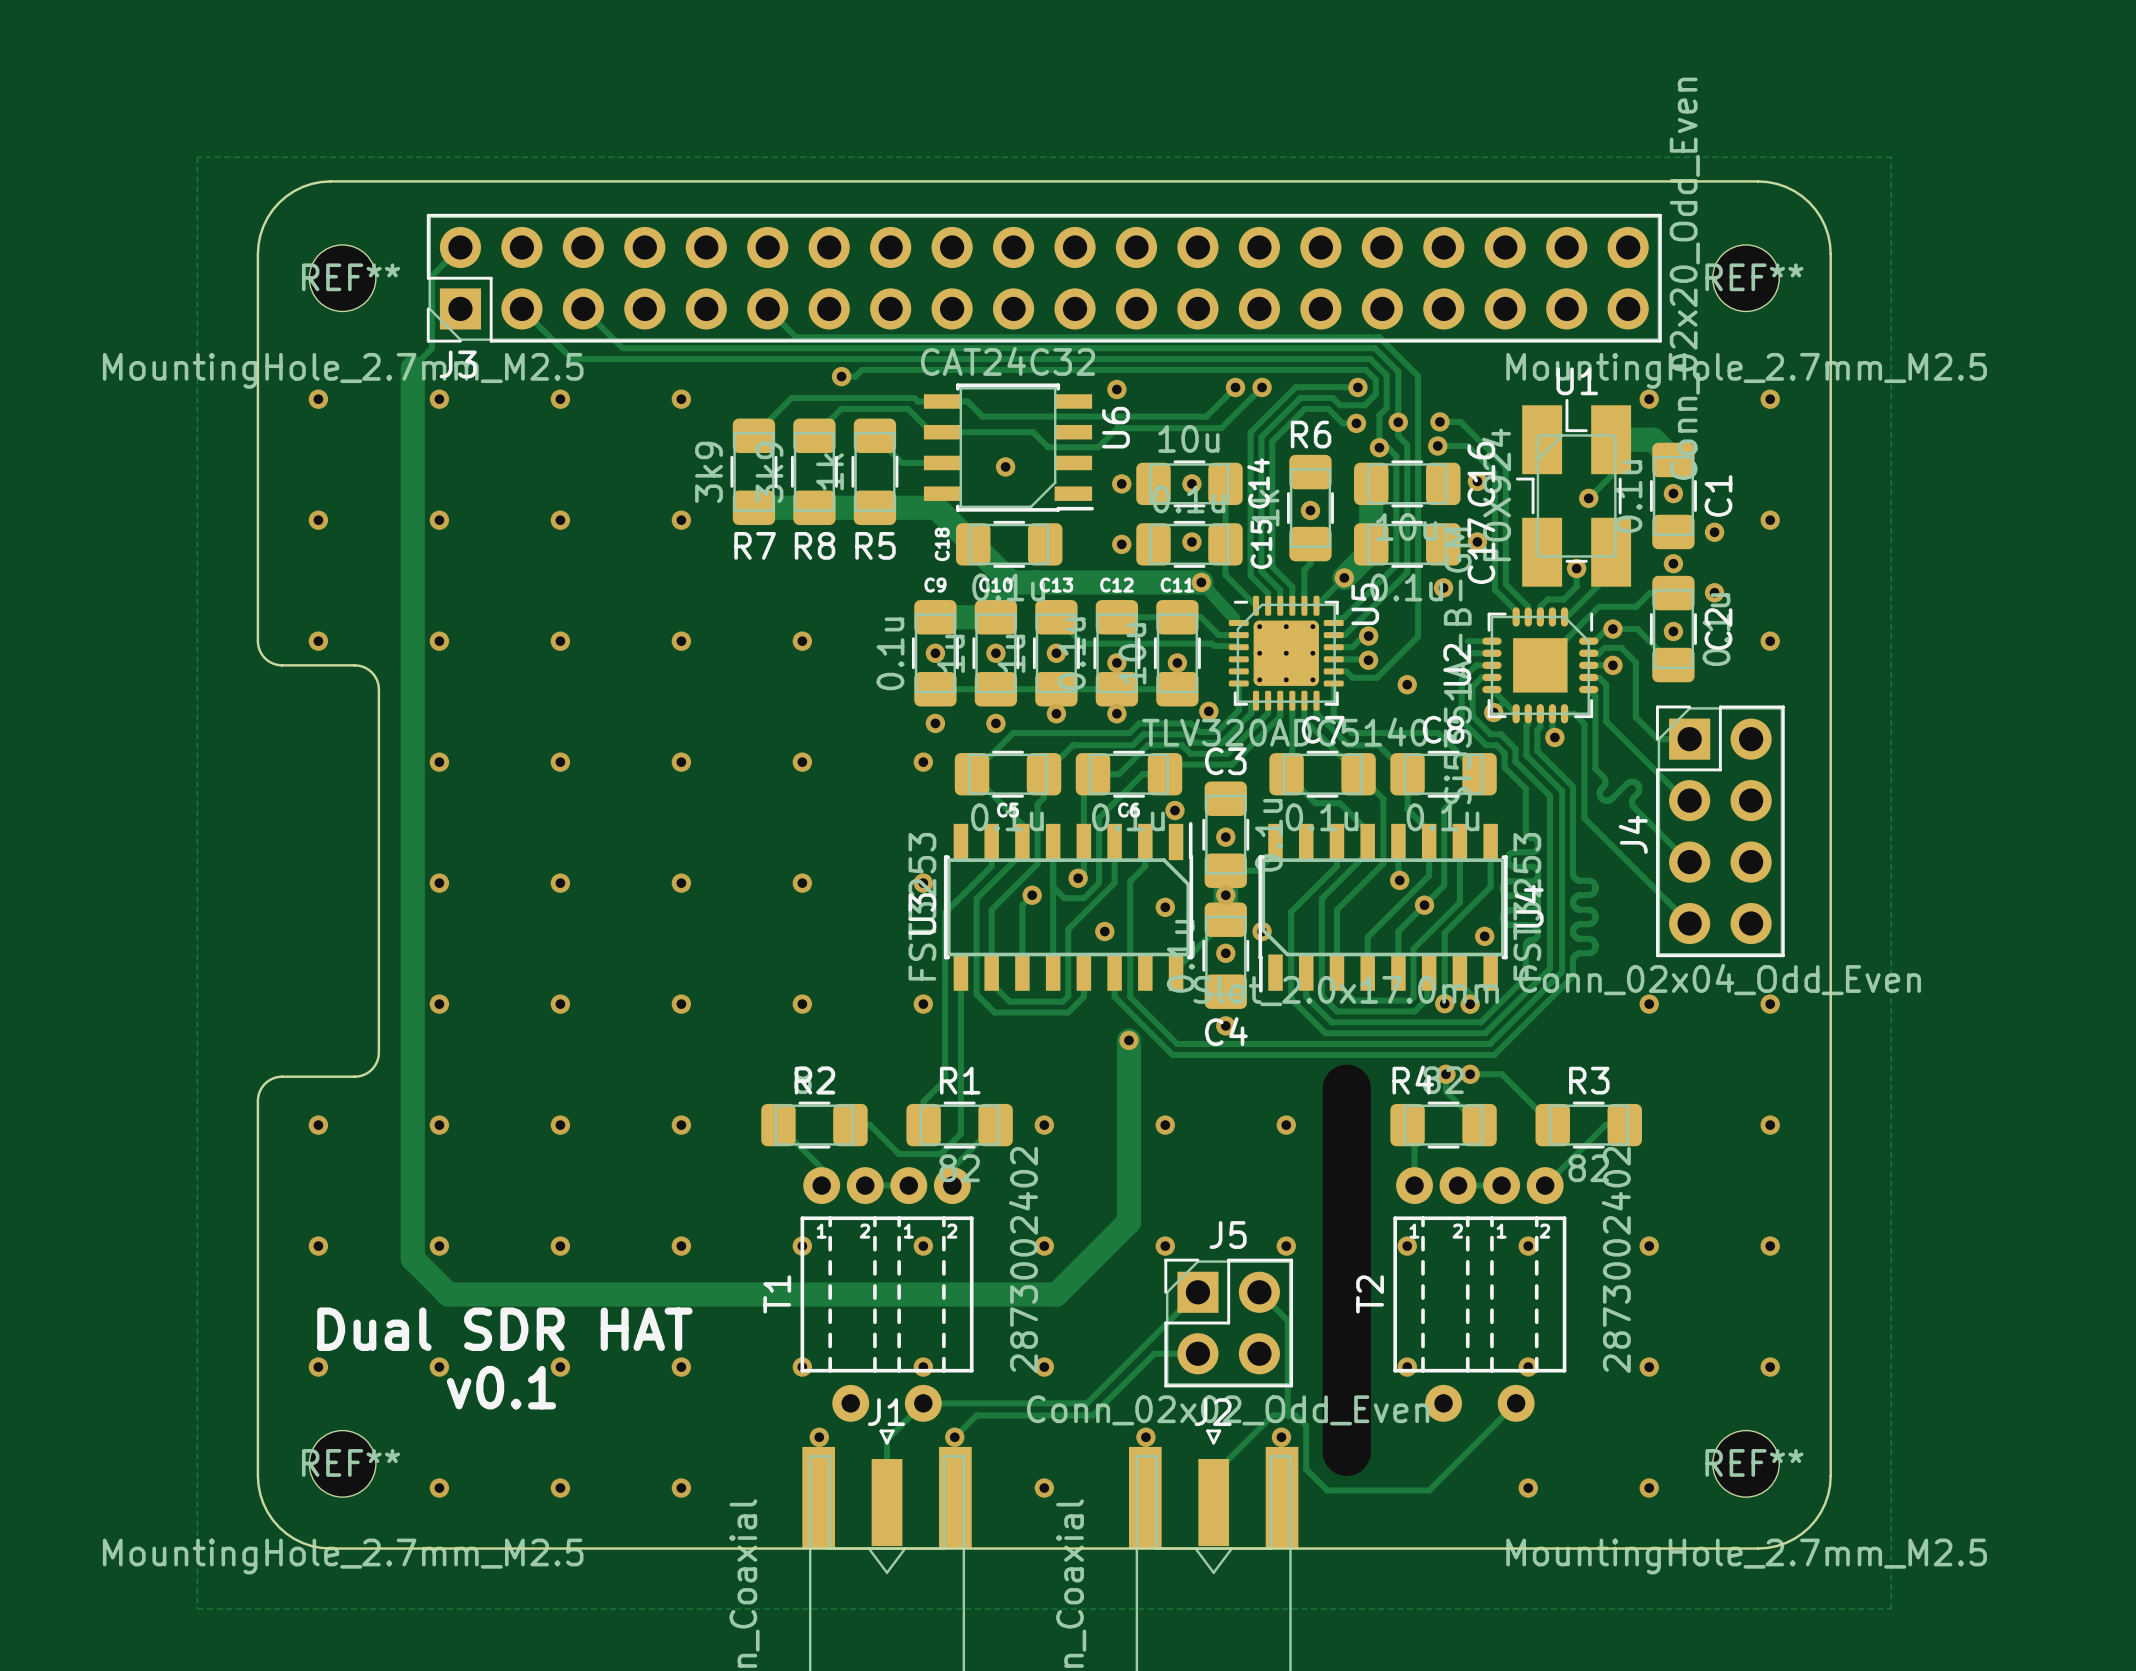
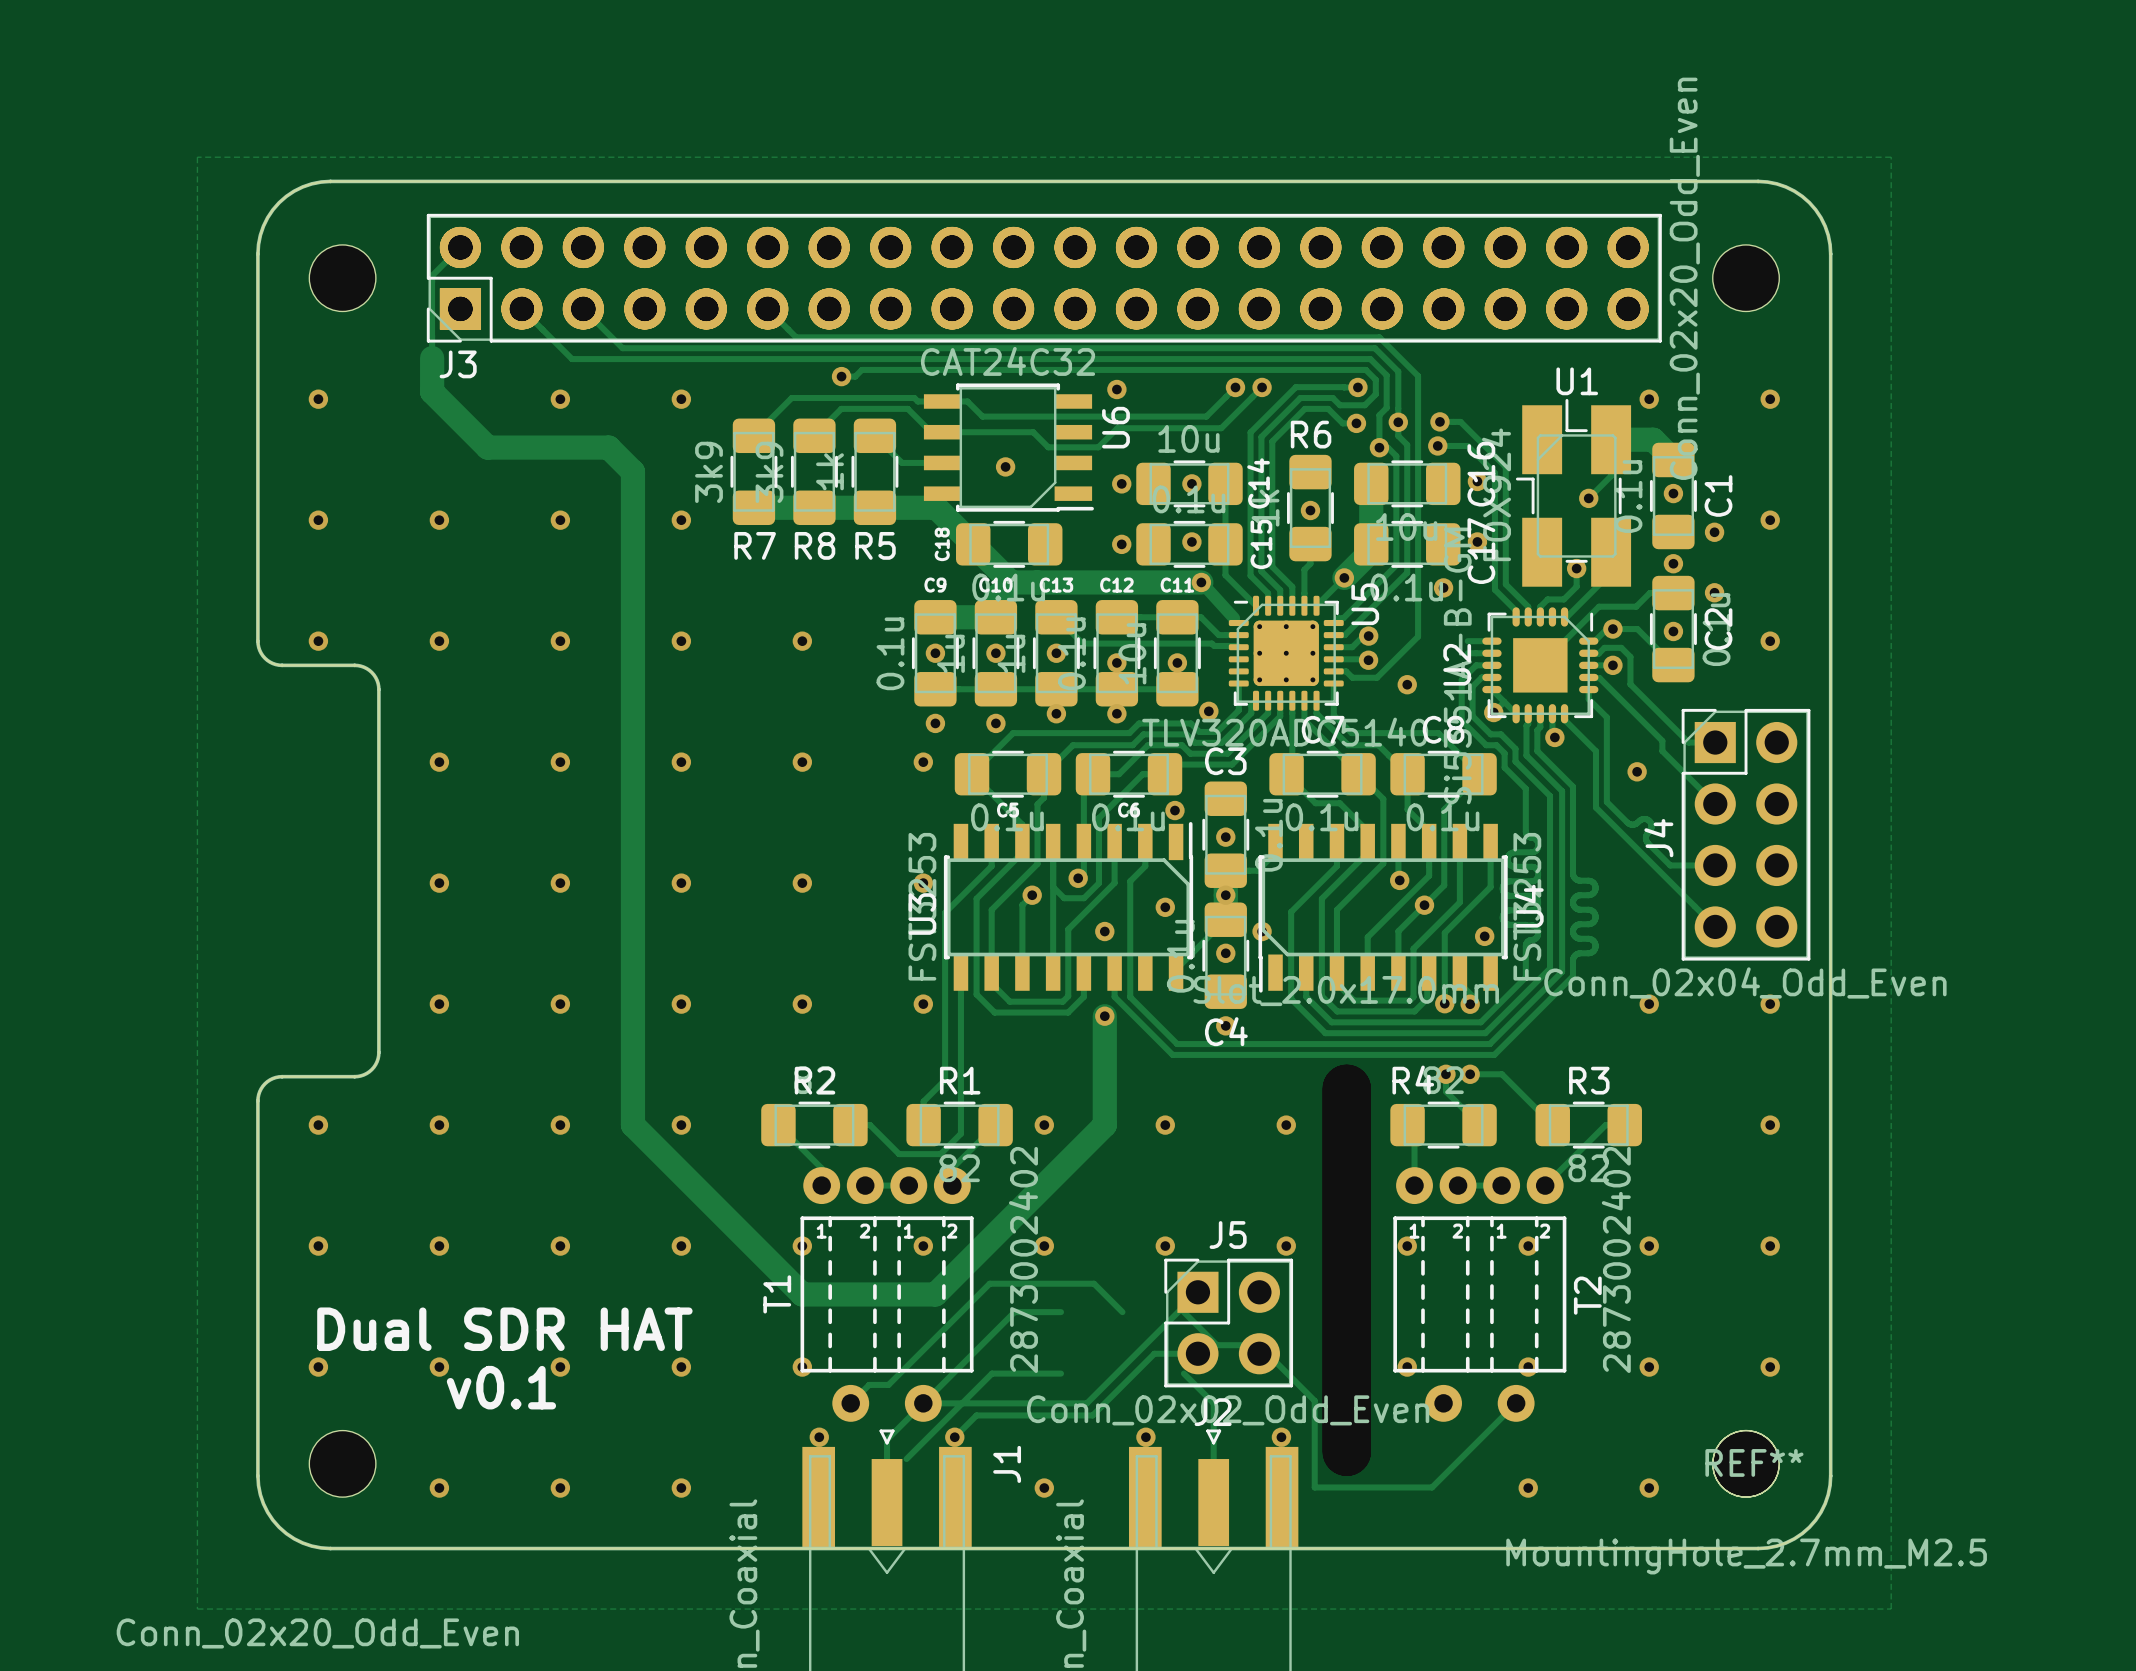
REF**: MountingHole_2.7mm_M2.5 (342, 278) -> none
REF**: MountingHole_2.7mm_M2.5 (1746, 278) -> none
track: (432, 348) (412, 367) (412, 1258) (448, 1294) (802, 1294) -> (432, 348) (432, 391) (487, 447) (608, 447) (632, 471) (632, 1125) (802, 1294)
via: (439, 399) -> none
track: (1630, 656) (1635, 662) (1635, 717) (1657, 739) (1689, 739) -> (1630, 656) (1630, 684) (1688, 742) (1715, 742)
track: (1606, 684) (1606, 721) (1685, 800) (1689, 800) -> (1606, 684) (1662, 740) (1662, 751) (1715, 804)
track: (1588, 689) (1595, 696) (1595, 768) (1605, 780) (1600, 791) (1600, 797) (1604, 800) (1609, 800) (1628, 782) (1635, 782) (1639, 789) (1632, 799) (1633, 806) (1689, 862) -> (1588, 689) (1588, 699) (1606, 717) (1606, 802) (1630, 824) (1634, 824) (1643, 818) (1649, 821) (1651, 827) (1646, 835) (1646, 840) (1670, 865) (1715, 865)
track: (1564, 713) (1574, 713) (1584, 724) (1584, 818) (1689, 923) -> (1564, 713) (1564, 719) (1596, 751) (1596, 807) (1715, 926)
via: none -> (1637, 771)
J4 position: (1720, 831) -> (1746, 834)
part: none -> Conn_02x20_Odd_Even (1044, 864)
track: (1129, 1040) (1129, 1221) (1056, 1294) (935, 1294) -> (1104, 1016) (1104, 1125) (935, 1294)
via position: (1129, 1040) -> (1104, 1016)
track: (1259, 1292) (1287, 1320) (1288, 1415) -> none
T2 name position: T2 (1370, 1294) -> T2 (1587, 1295)
track: none -> (1061, 1312) (1014, 1312) (923, 1403)
track: none -> (1122, 1312) (1094, 1283) (989, 1283) (888, 1384) (869, 1384) (850, 1403)
via: (923, 1367) -> none
via: (1044, 1367) -> none
track: none -> (1061, 1373) (991, 1373) (906, 1459)
track: none -> (1183, 1373) (1213, 1403) (1213, 1474)
J1 name rotation: 0° (886, 1412) -> 90° counterclockwise (1007, 1464)
J1 name position: J1 (886, 1412) -> J1 (1007, 1464)
REF**: MountingHole_2.7mm_M2.5 (342, 1463) -> none
track: (1213, 1474) (1272, 1415) (1295, 1415) (1306, 1425) (1306, 1469) (1327, 1490) (1429, 1490) (1432, 1487) -> (1183, 1312) (1216, 1345) (1259, 1345) (1314, 1400) (1314, 1487) (1432, 1487)

